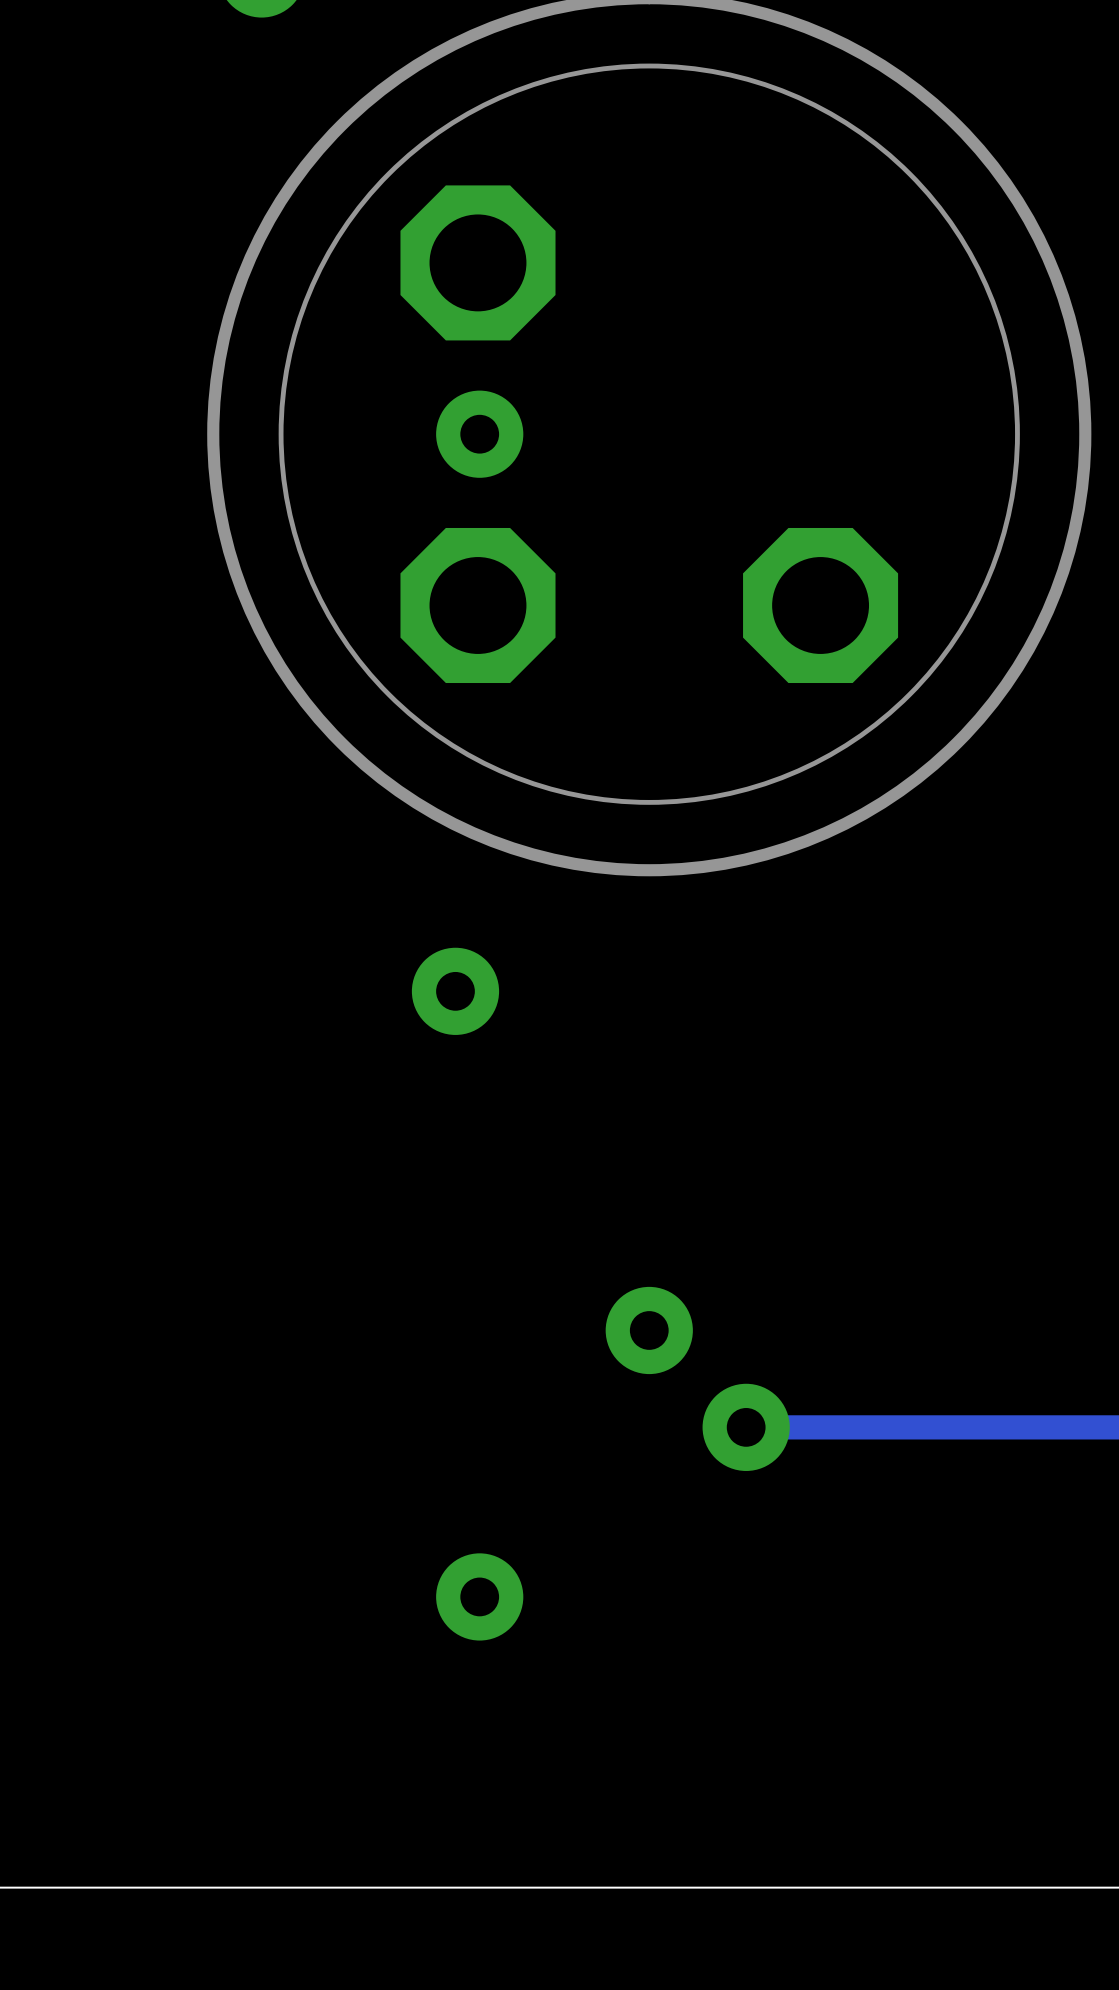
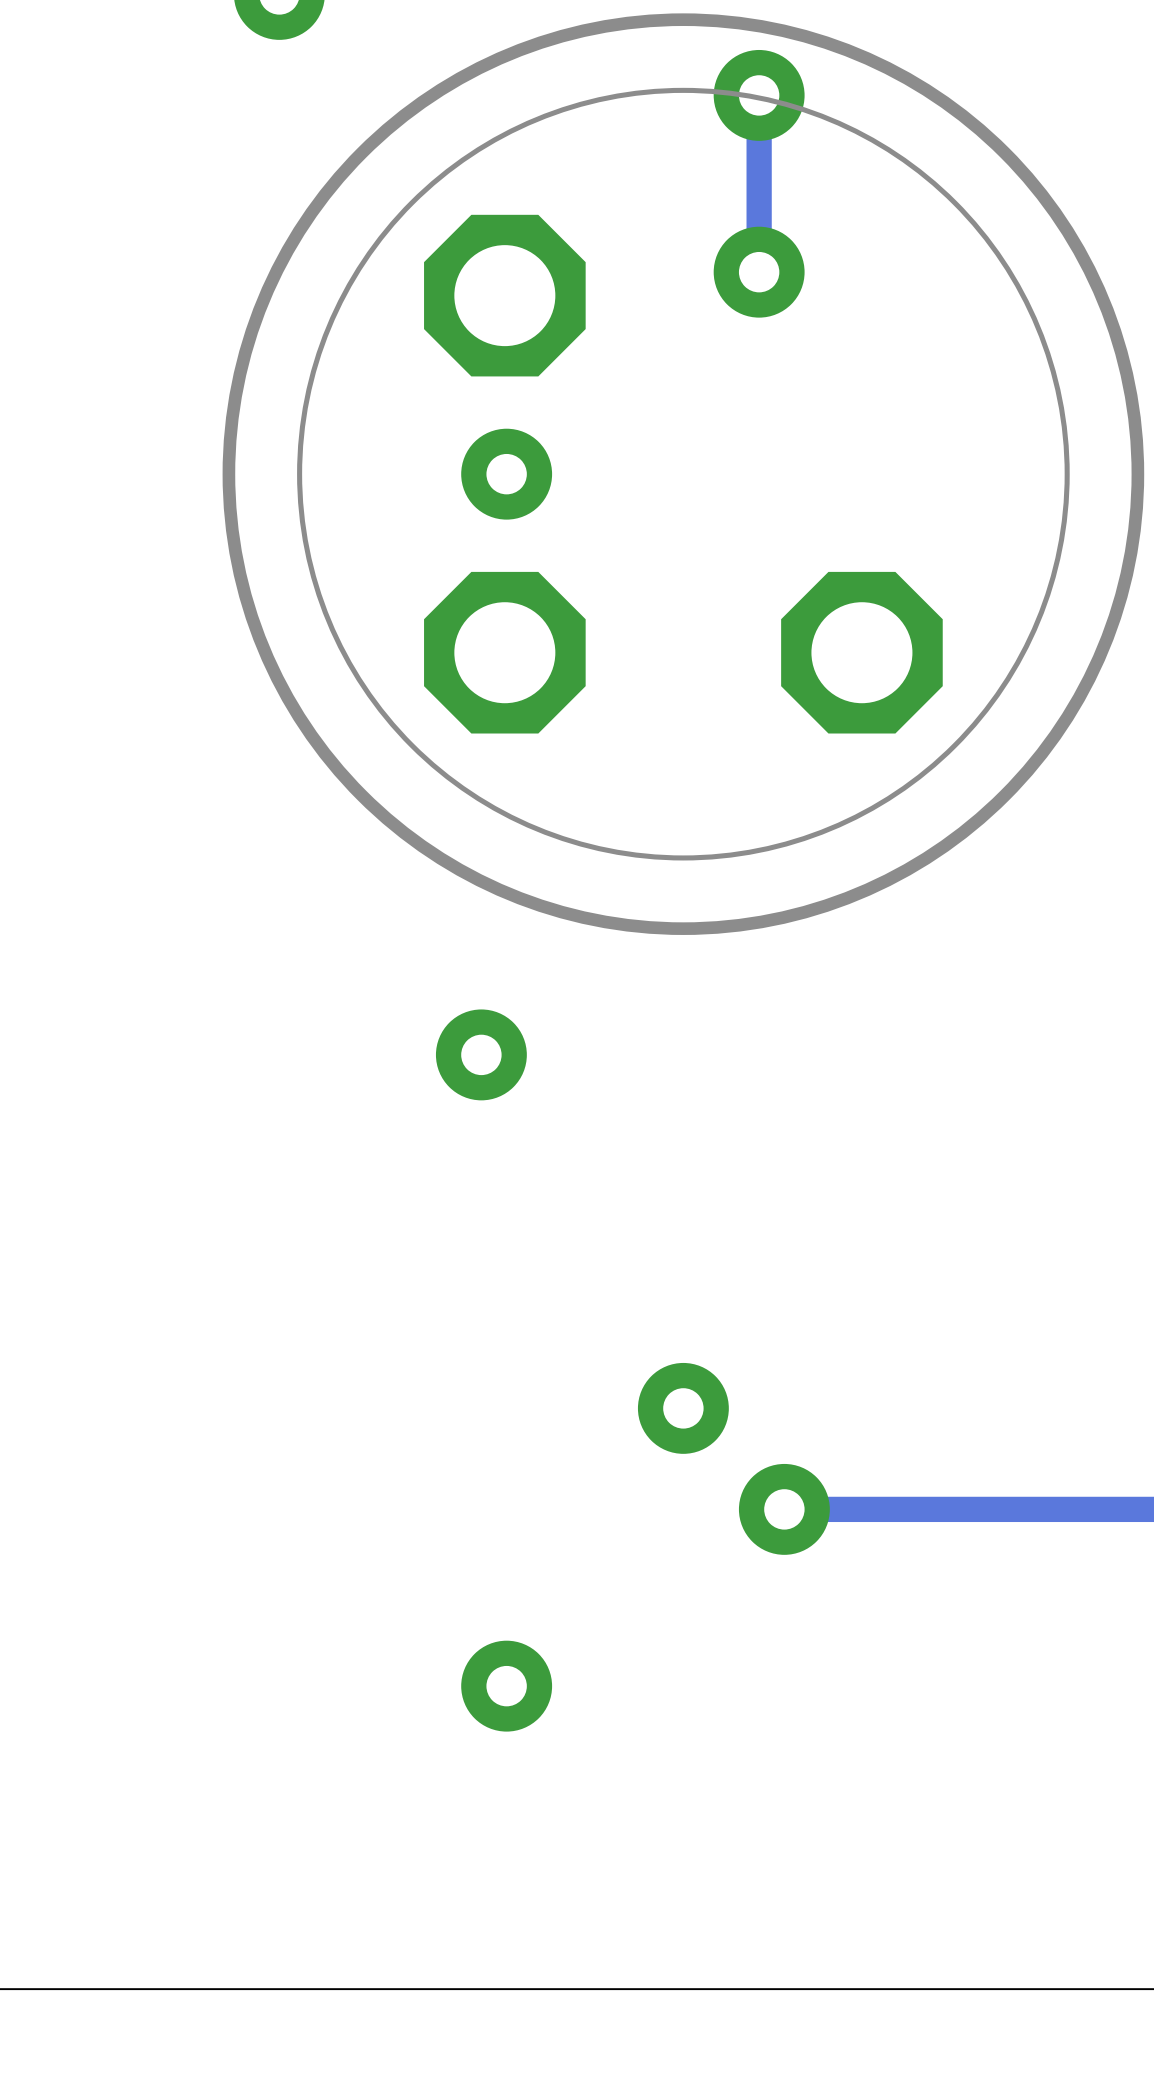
track: none -> (759, 95) (759, 272)
via: none -> (759, 95)
via: none -> (759, 272)

